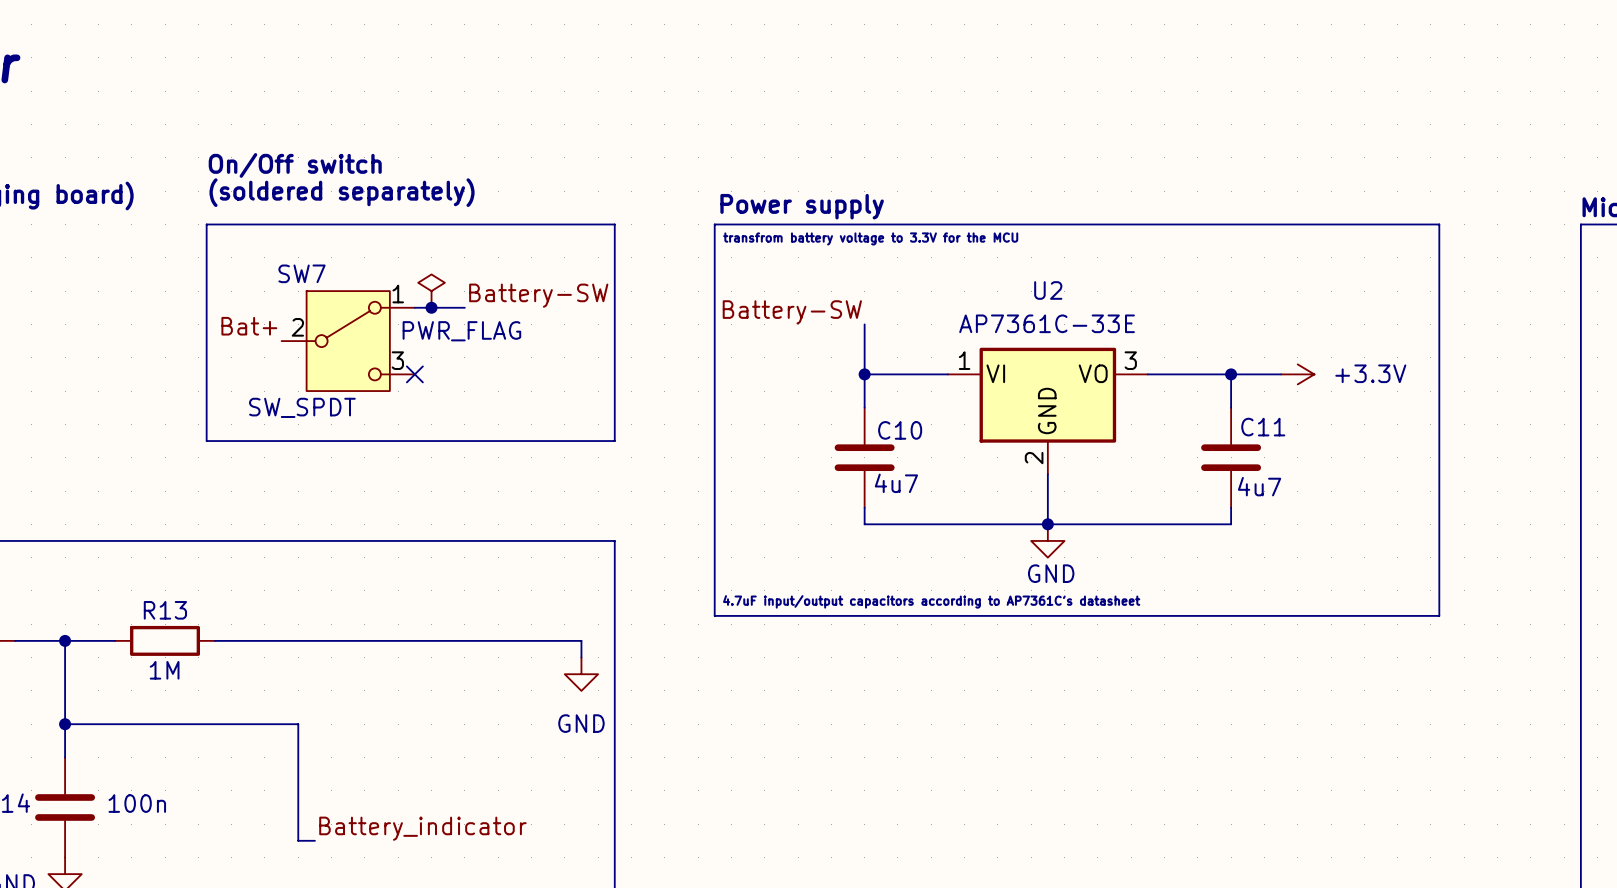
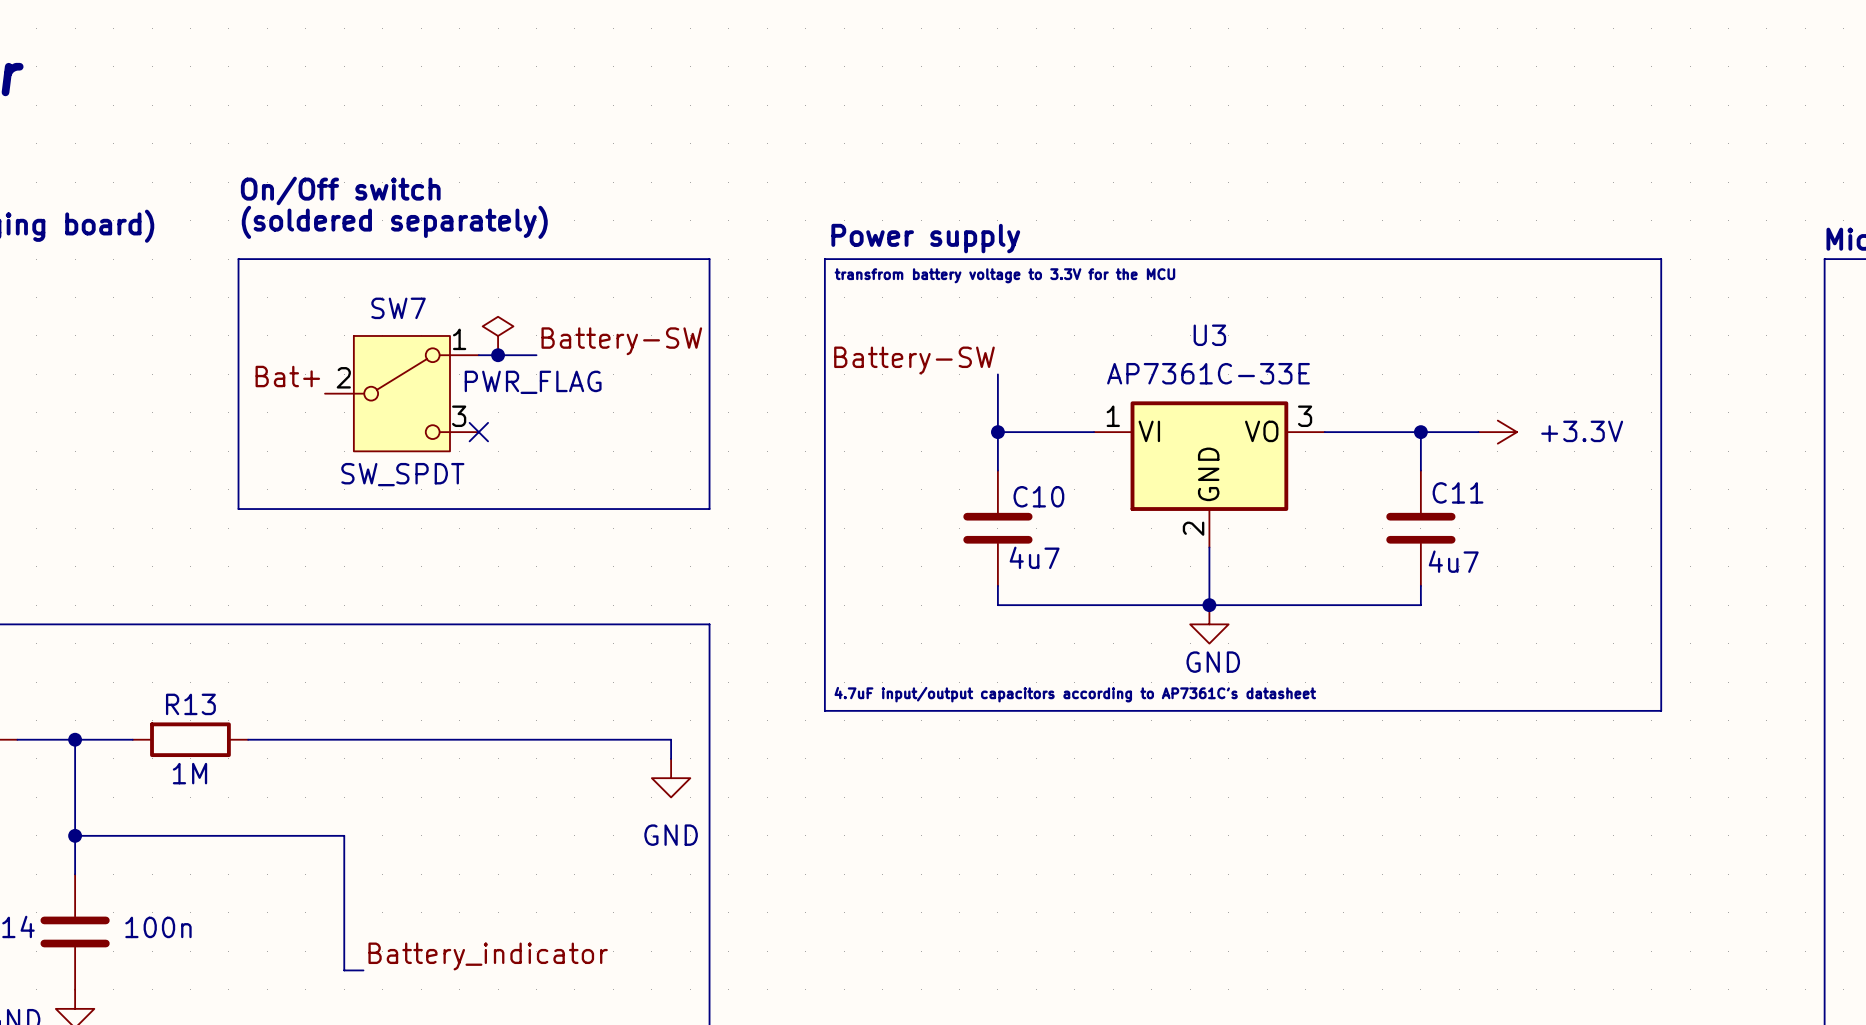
SW7 name position: SW7 (302, 273) -> SW7 (398, 308)
U2 name: U2 (1048, 290) -> U3 (1209, 335)
SW7 value position: SW_SPDT (302, 407) -> SW_SPDT (402, 474)

